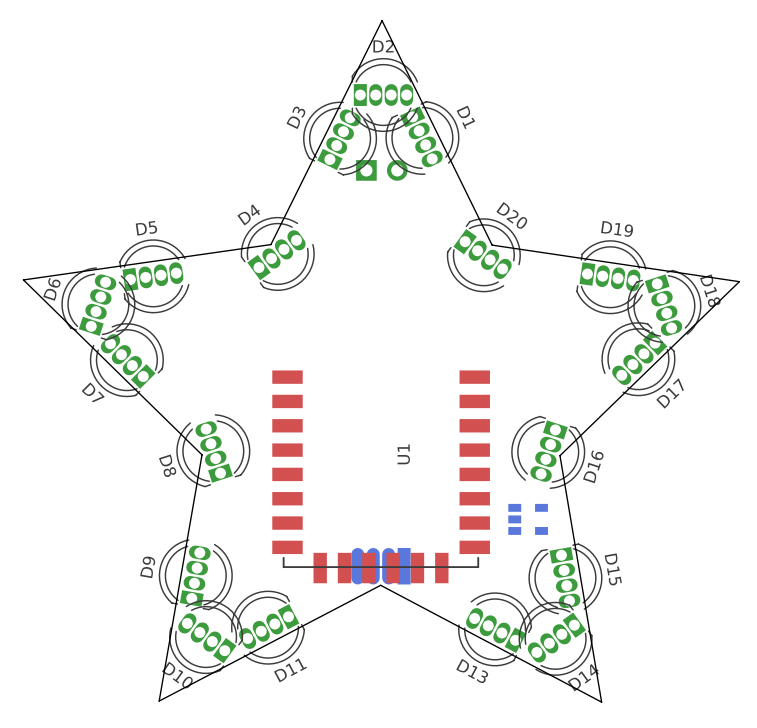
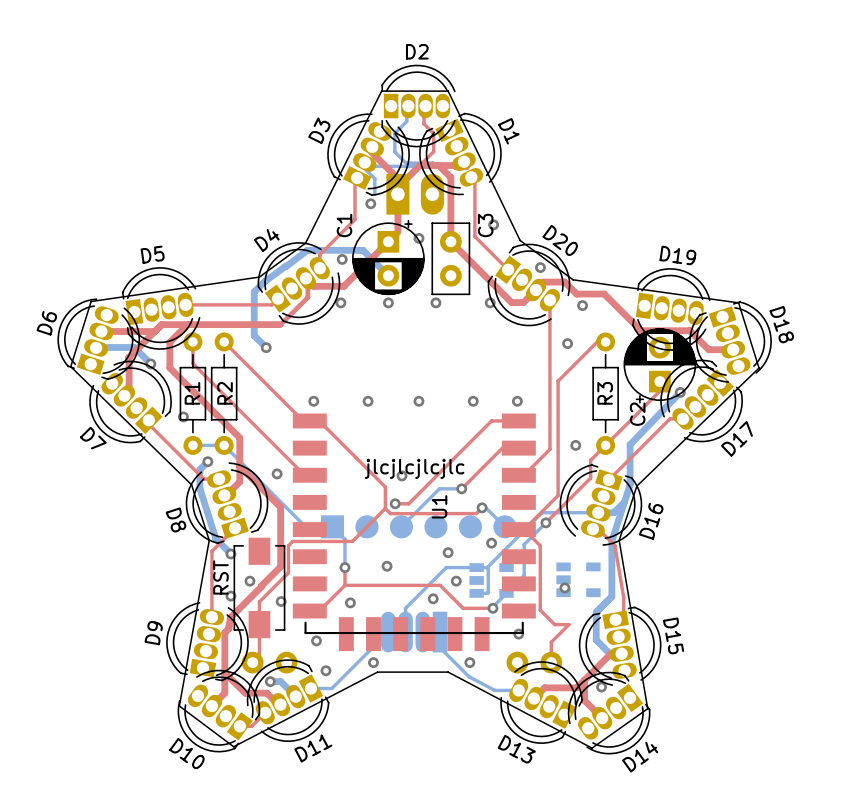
board edge: (382, 20) (492, 245) (739, 281) (559, 455) (601, 702) (380, 585) (159, 701) (202, 454) (23, 279) (270, 244) (382, 20) -> (381, 91) (305, 243) (259, 277) (91, 301) (70, 366) (191, 484) (209, 540) (179, 706) (233, 746) (377, 672) (448, 672) (592, 748) (647, 708) (619, 540) (636, 486) (759, 368) (738, 302) (573, 279) (520, 240) (448, 91) (381, 91)
bottom track: none -> (406, 110) (406, 121) (394, 133) (394, 151) (405, 163) (433, 163) (429, 166) (362, 166) (374, 178) (374, 194)
top track: none -> (423, 110) (423, 123) (433, 133) (433, 151) (419, 165)
top track: none -> (370, 150) (397, 178) (397, 232) (343, 286) (313, 286) (305, 278) (307, 280) (307, 297) (280, 324) (161, 324) (128, 357) (129, 391) (124, 395) (127, 392)
top track: none -> (438, 165) (450, 177) (450, 241) (511, 302) (523, 302) (543, 282) (564, 282) (576, 294) (604, 294) (640, 330) (689, 330) (708, 349) (733, 349)
top track: none -> (467, 165) (419, 165) (397, 187)
part footprint: [356, 160, 408, 181] -> [386, 173, 444, 215]
top track: none -> (354, 181) (354, 219) (319, 254) (319, 268)
top track: none -> (474, 181) (474, 236) (508, 269)
via: none -> (370, 203)
via: none -> (493, 224)
via: none -> (418, 238)
C1: none -> (388, 257)
C3: none -> (450, 258)
via: none -> (342, 259)
via: none -> (540, 267)
bottom track: none -> (388, 275) (363, 250) (307, 250) (264, 281) (254, 292) (254, 335) (266, 347)
top track: none -> (278, 298) (271, 304) (185, 304)
top track: none -> (549, 300) (549, 449) (524, 475) (509, 475)
via: none -> (340, 302)
via: none -> (388, 302)
via: none -> (435, 302)
via: none -> (490, 302)
via: none -> (582, 305)
top track: none -> (187, 324) (169, 342) (169, 368) (239, 437) (239, 481) (224, 495)
top track: none -> (101, 331) (154, 331)
top track: none -> (605, 336) (603, 336) (558, 381) (558, 495) (524, 529) (540, 545) (540, 610) (554, 624) (568, 624) (551, 642) (551, 662)
top track: none -> (192, 341) (192, 363) (304, 475) (319, 475)
top track: none -> (224, 341) (303, 420) (319, 420) (385, 487) (385, 508)
via: none -> (567, 343)
bottom track: none -> (96, 347) (134, 347) (150, 363)
via: none -> (266, 347)
via: none -> (150, 363)
C2: none -> (659, 365)
top track: none -> (659, 381) (659, 391) (590, 460) (590, 478) (545, 522)
bottom track: none -> (680, 392) (630, 444) (630, 485) (611, 541) (611, 596) (596, 612) (596, 640) (609, 653) (621, 653)
via: none -> (680, 392)
R1: none -> (192, 393)
R2: none -> (224, 393)
R3: none -> (605, 393)
via: none -> (313, 401)
via: none -> (368, 401)
via: none -> (418, 401)
via: none -> (473, 401)
via: none -> (517, 401)
via: none -> (183, 416)
top track: none -> (682, 418) (669, 418) (608, 479)
top track: none -> (148, 420) (148, 424) (203, 479) (219, 479)
top track: none -> (509, 420) (491, 420) (408, 503) (395, 503)
bottom track: none -> (192, 445) (224, 445) (305, 526) (332, 526) (344, 539) (344, 567)
via: none -> (575, 445)
top track: none -> (509, 448) (502, 448) (461, 488)
bottom track: none -> (207, 461) (199, 469) (199, 488) (215, 538) (230, 554)
via: none -> (207, 461)
top track: none -> (239, 466) (280, 507) (280, 566) (230, 617) (229, 628) (224, 632) (224, 693) (211, 706)
text: none -> jlcjlcjlcjlc (414, 468)
via: none -> (277, 473)
via: none -> (401, 475)
bottom track: none -> (461, 488) (439, 488) (401, 526)
via: none -> (461, 488)
bottom track: none -> (624, 502) (613, 512) (542, 512) (487, 567)
via: none -> (395, 503)
top track: none -> (482, 507) (476, 513) (390, 513) (385, 508)
bottom track: none -> (482, 507) (485, 507) (504, 526)
via: none -> (482, 507)
top track: none -> (385, 508) (352, 541) (292, 541) (288, 545) (288, 572) (259, 601) (259, 655) (252, 662)
bottom track: none -> (545, 522) (524, 544) (524, 575) (492, 608)
via: none -> (545, 522)
part: none -> (418, 526)
top track: none -> (235, 528) (212, 551) (211, 617)
top track: none -> (592, 529) (598, 529) (614, 545) (623, 597) (623, 611) (615, 619)
via: none -> (491, 543)
via: none -> (448, 552)
via: none -> (230, 554)
via: none -> (387, 566)
top track: none -> (344, 567) (344, 585)
via: none -> (344, 567)
bottom track: none -> (487, 567) (446, 567) (405, 608) (405, 632)
bottom track: none -> (487, 567) (488, 592) (476, 593)
via: none -> (249, 581)
via: none -> (456, 581)
part: none -> (491, 580)
top track: none -> (344, 585) (319, 611)
top track: none -> (344, 585) (440, 585) (463, 608) (492, 608)
part: none -> RST (259, 587)
via: none -> (564, 587)
via: none -> (230, 596)
via: none -> (433, 598)
via: none -> (281, 601)
via: none -> (350, 602)
via: none -> (492, 608)
bottom track: none -> (388, 632) (331, 688) (310, 688)
bottom track: none -> (440, 632) (440, 647) (469, 676) (494, 690) (518, 690)
via: none -> (518, 634)
via: none -> (316, 640)
top track: none -> (621, 653) (610, 653) (576, 687) (544, 687) (533, 698)
part: none -> (269, 662)
via: none -> (373, 662)
via: none -> (469, 662)
part: none -> (534, 662)
via: none -> (325, 670)
top track: none -> (224, 672) (245, 693) (266, 693) (280, 704)
top track: none -> (584, 680) (584, 700) (602, 718)
bottom track: none -> (270, 681) (280, 681) (295, 696)
via: none -> (270, 681)
via: none -> (601, 687)
top track: none -> (265, 712) (251, 726) (239, 726)

